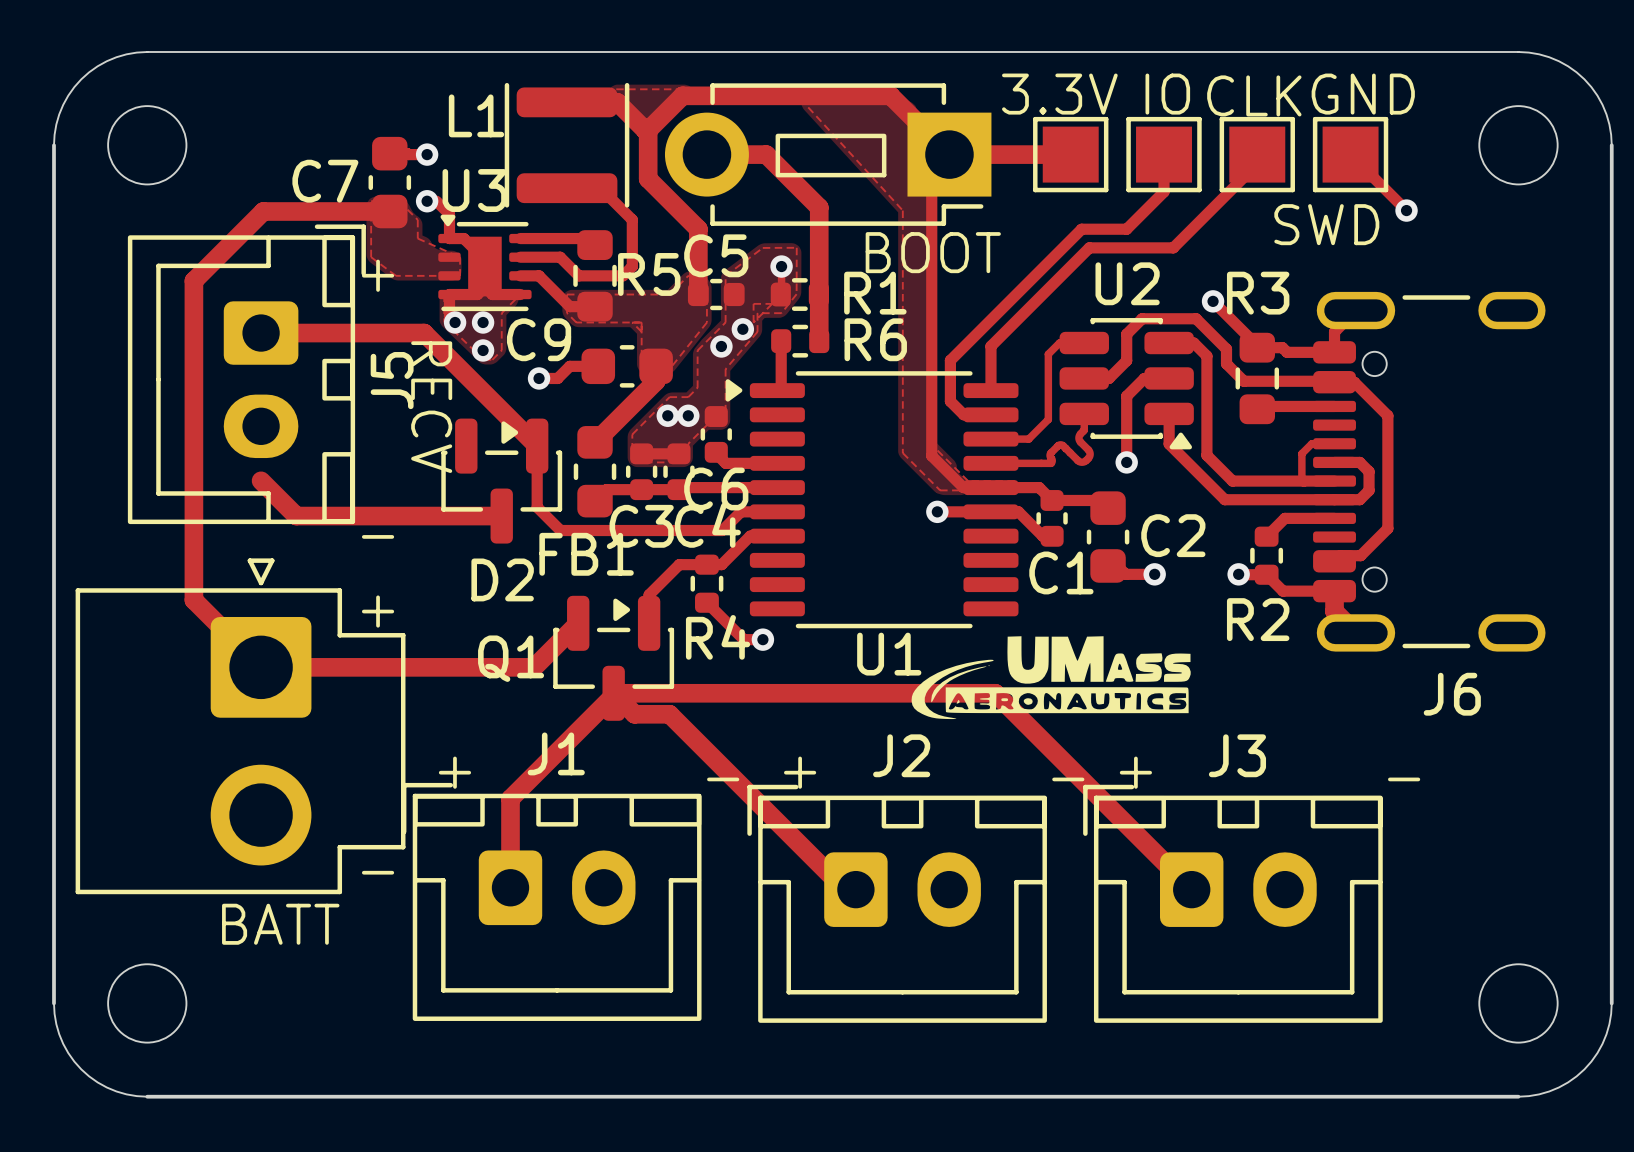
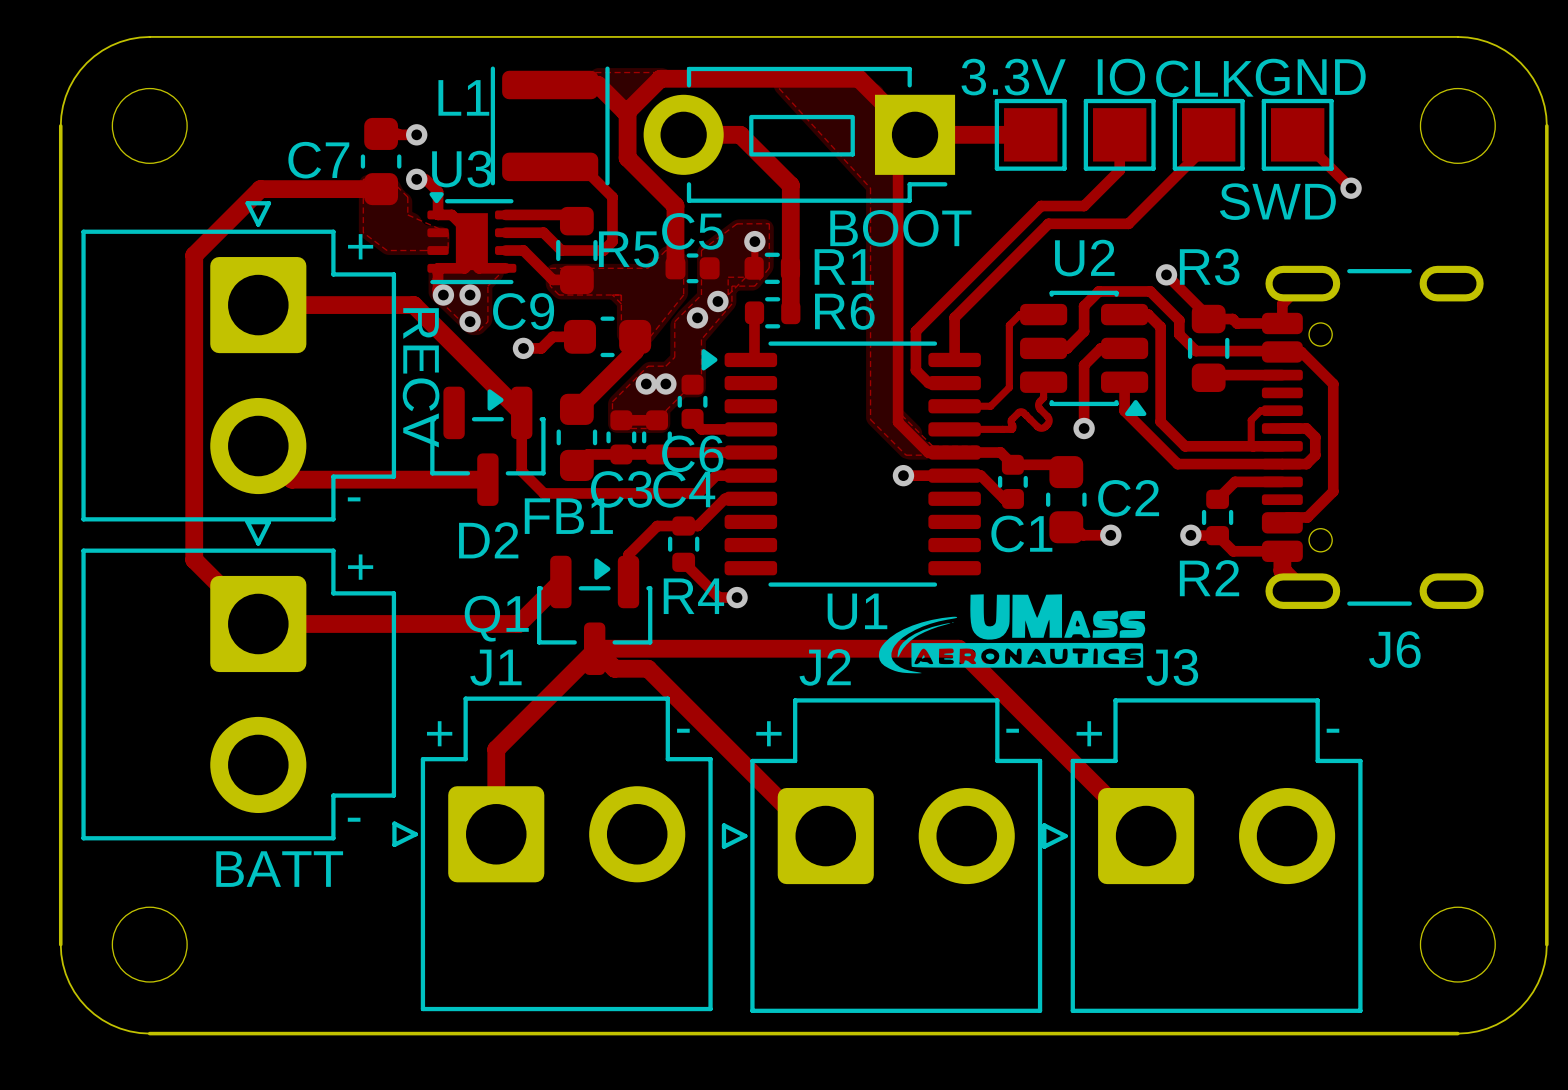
J5: (246, 374) -> none
part: none -> (238, 361)
J1 name position: J1 (556, 753) -> J1 (495, 667)
J2 name position: J2 (901, 755) -> J2 (825, 667)
J1 footprint: [401, 782, 702, 1021] -> [392, 696, 713, 1012]
J2 footprint: [747, 784, 1047, 1023] -> [721, 698, 1043, 1013]
J3 footprint: [1083, 784, 1383, 1023] -> [1042, 698, 1363, 1013]

